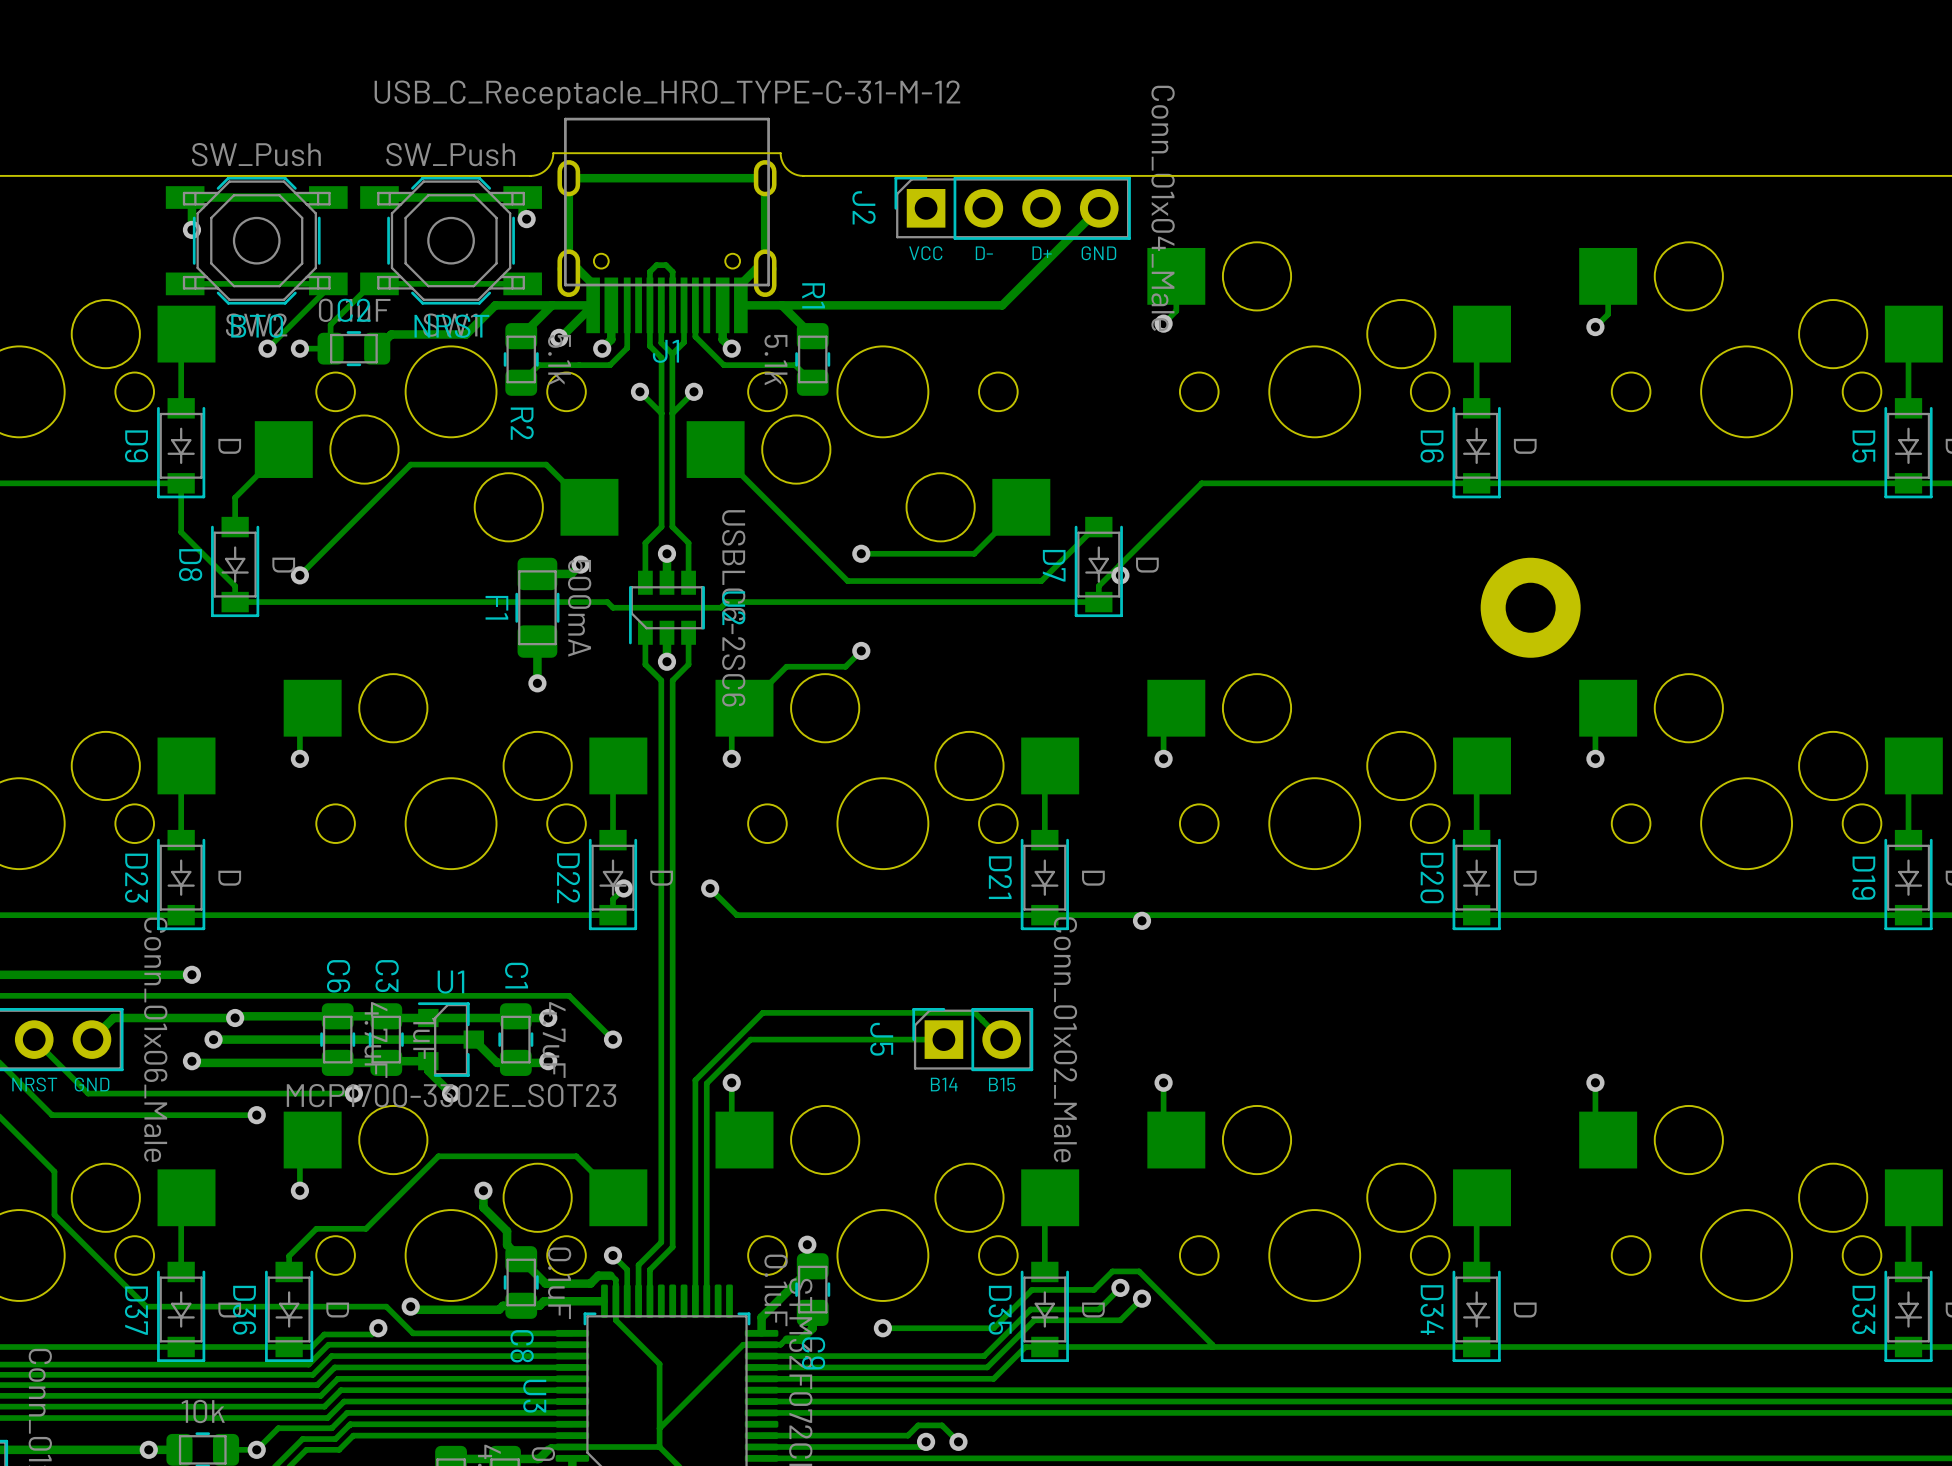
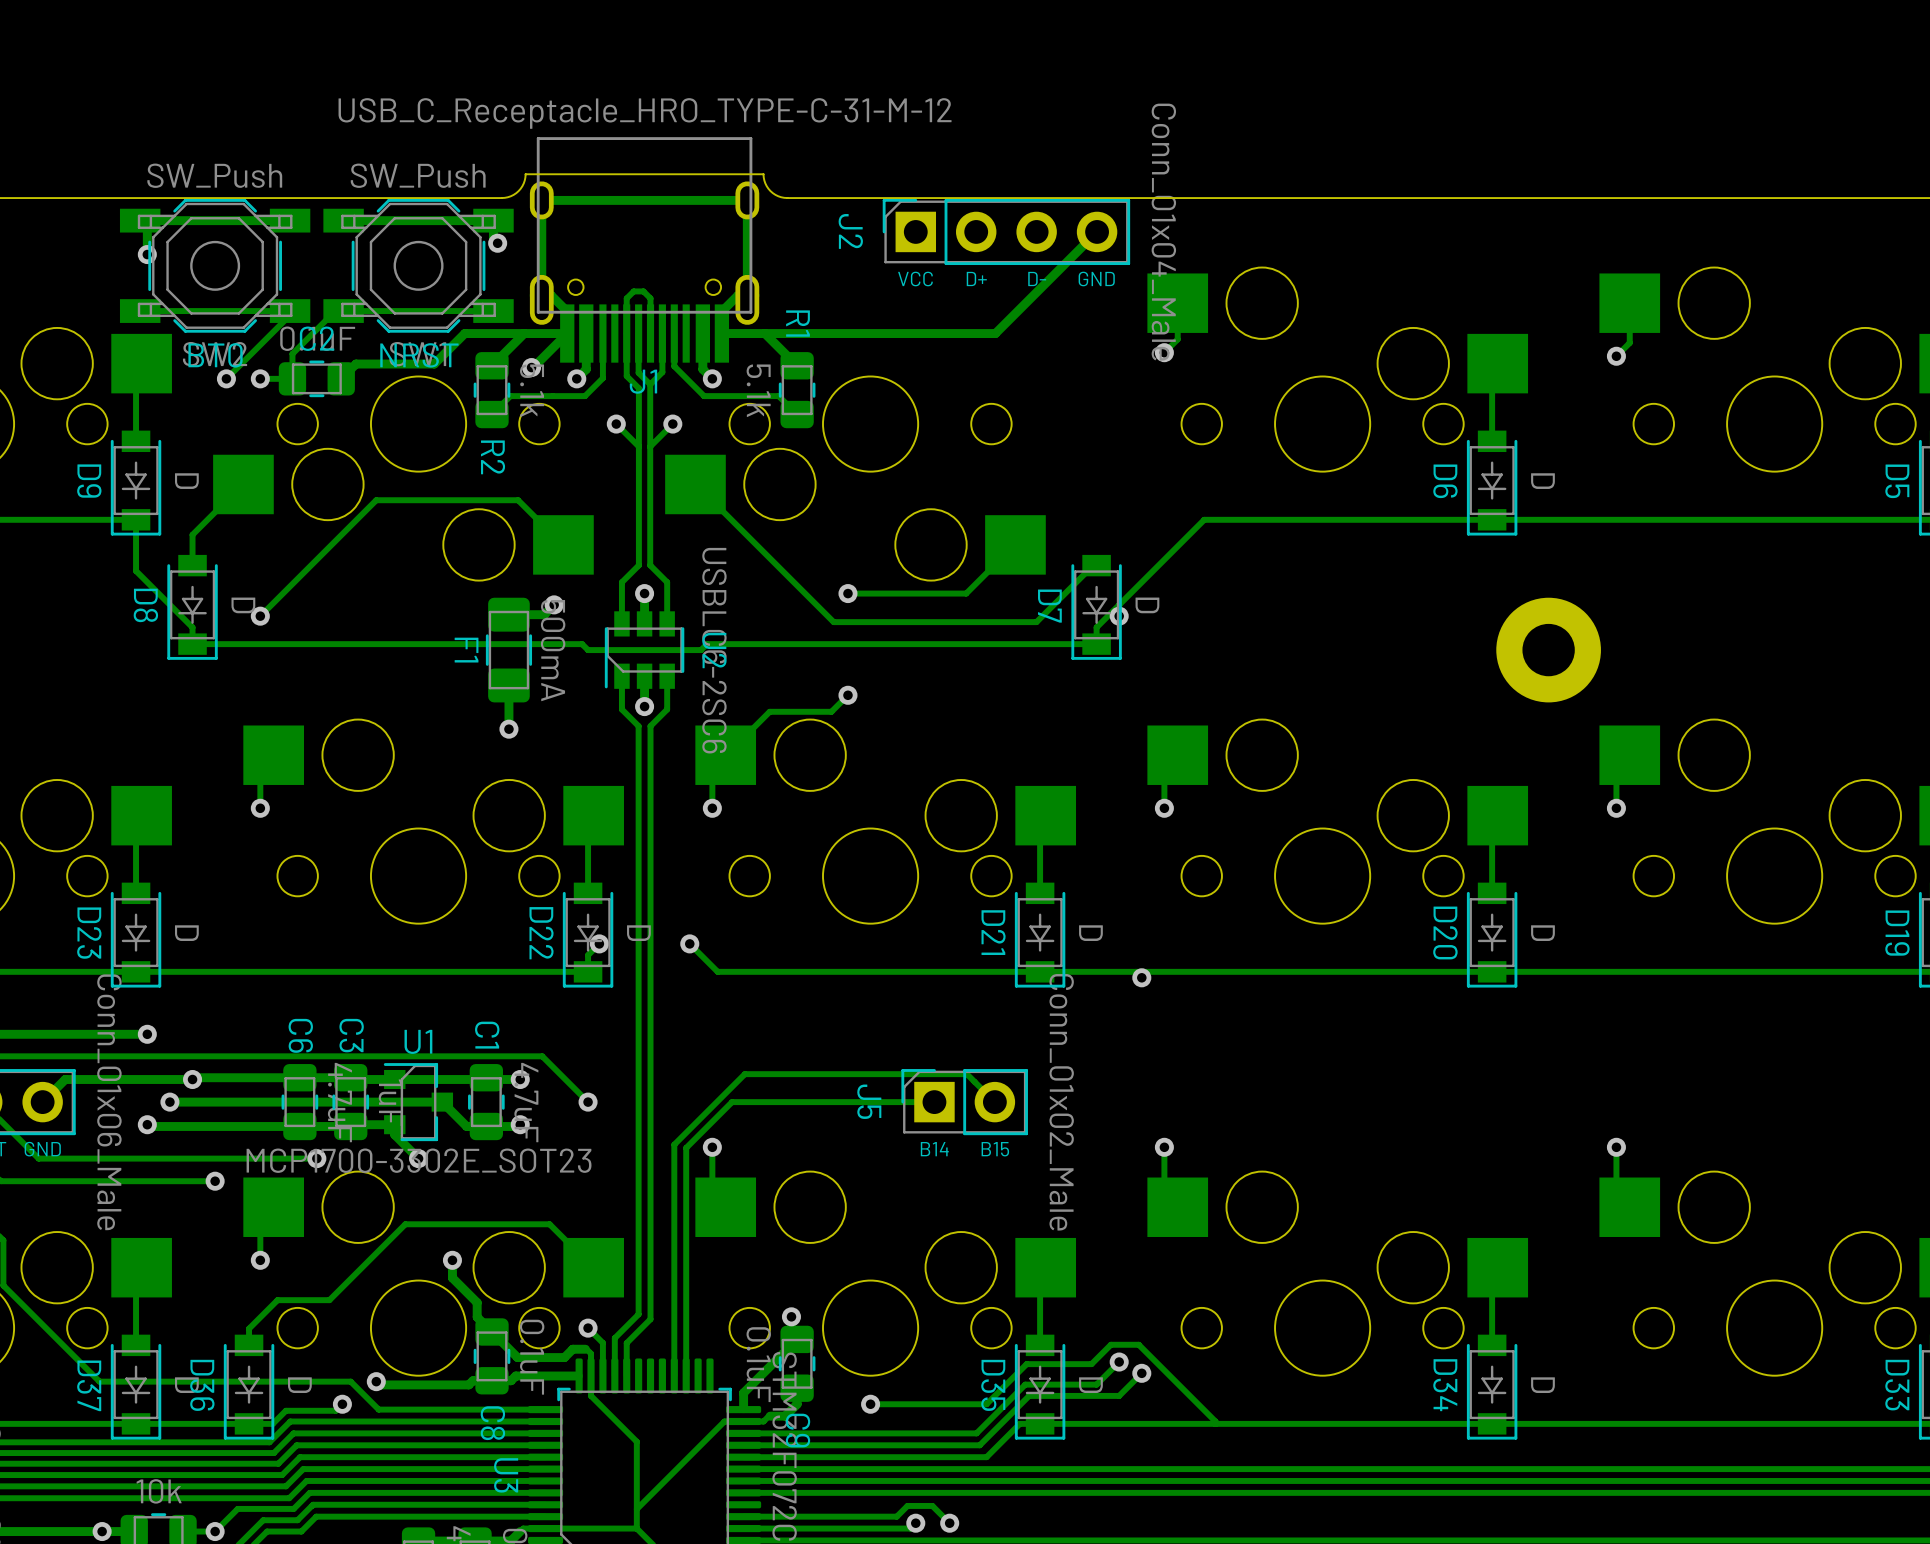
text: D- (984, 253) -> D+ (976, 278)
text: D+ (1042, 253) -> D- (1037, 278)

